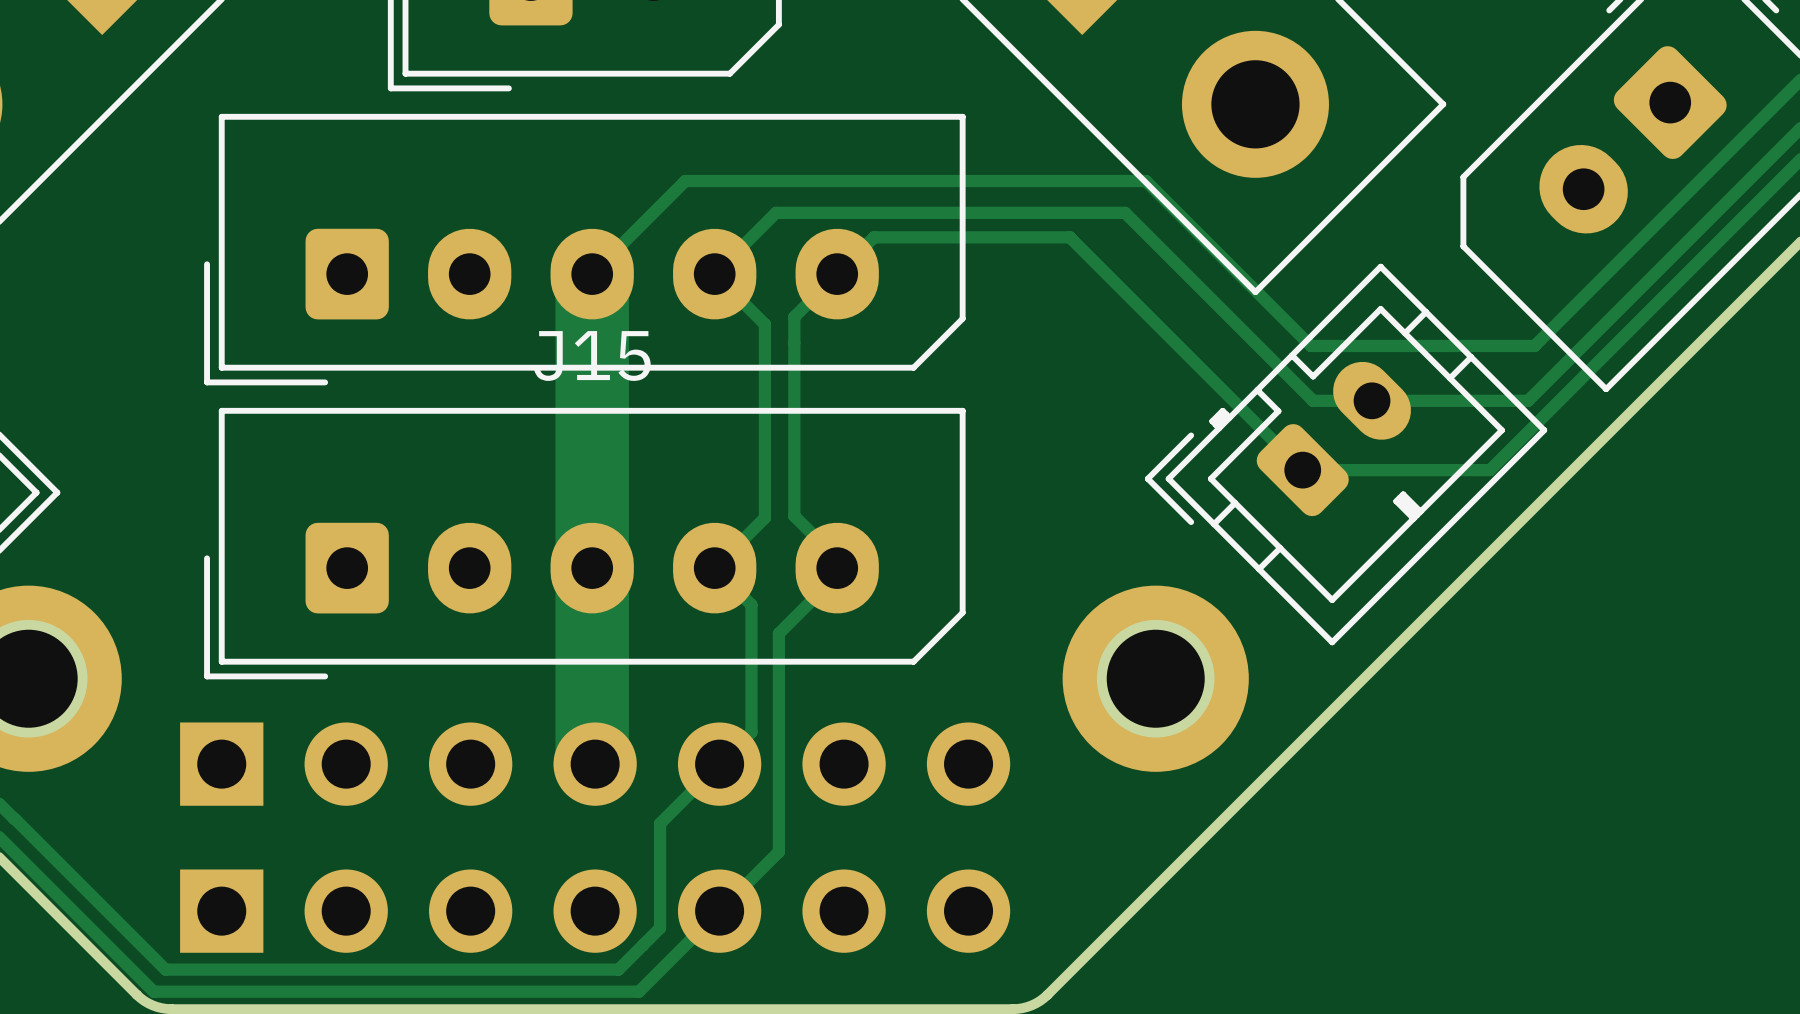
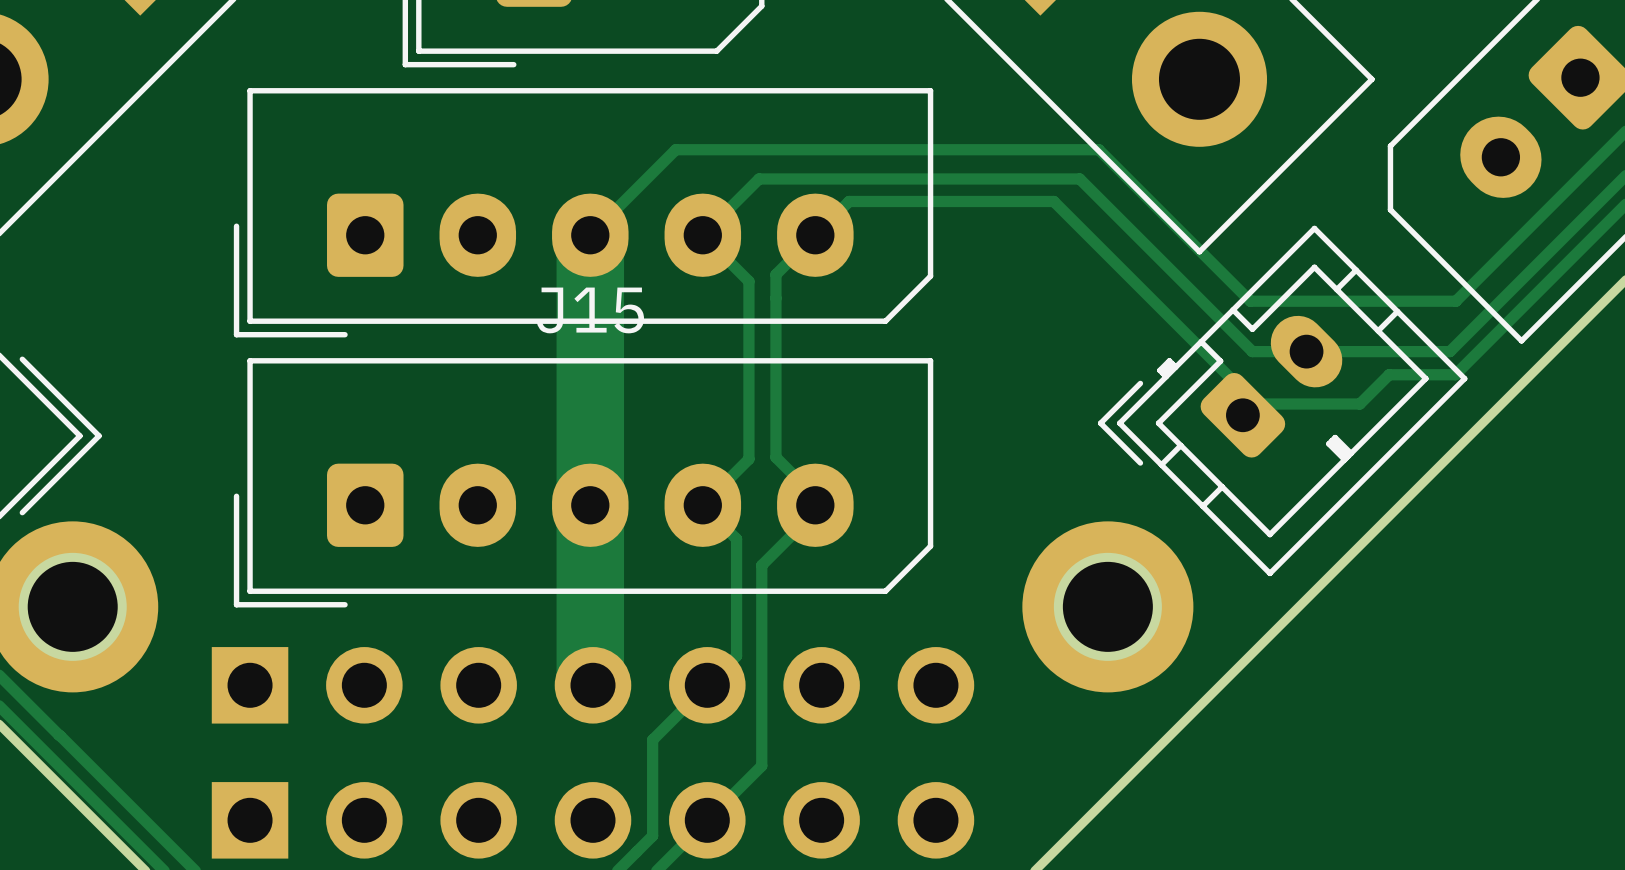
track: (1069, 237) (1302, 470) (1490, 470) (1534, 426) -> (1029, 201) (1053, 201) (1242, 390) (1242, 415) (1254, 404) (1359, 404) (1389, 374) (1455, 374)

